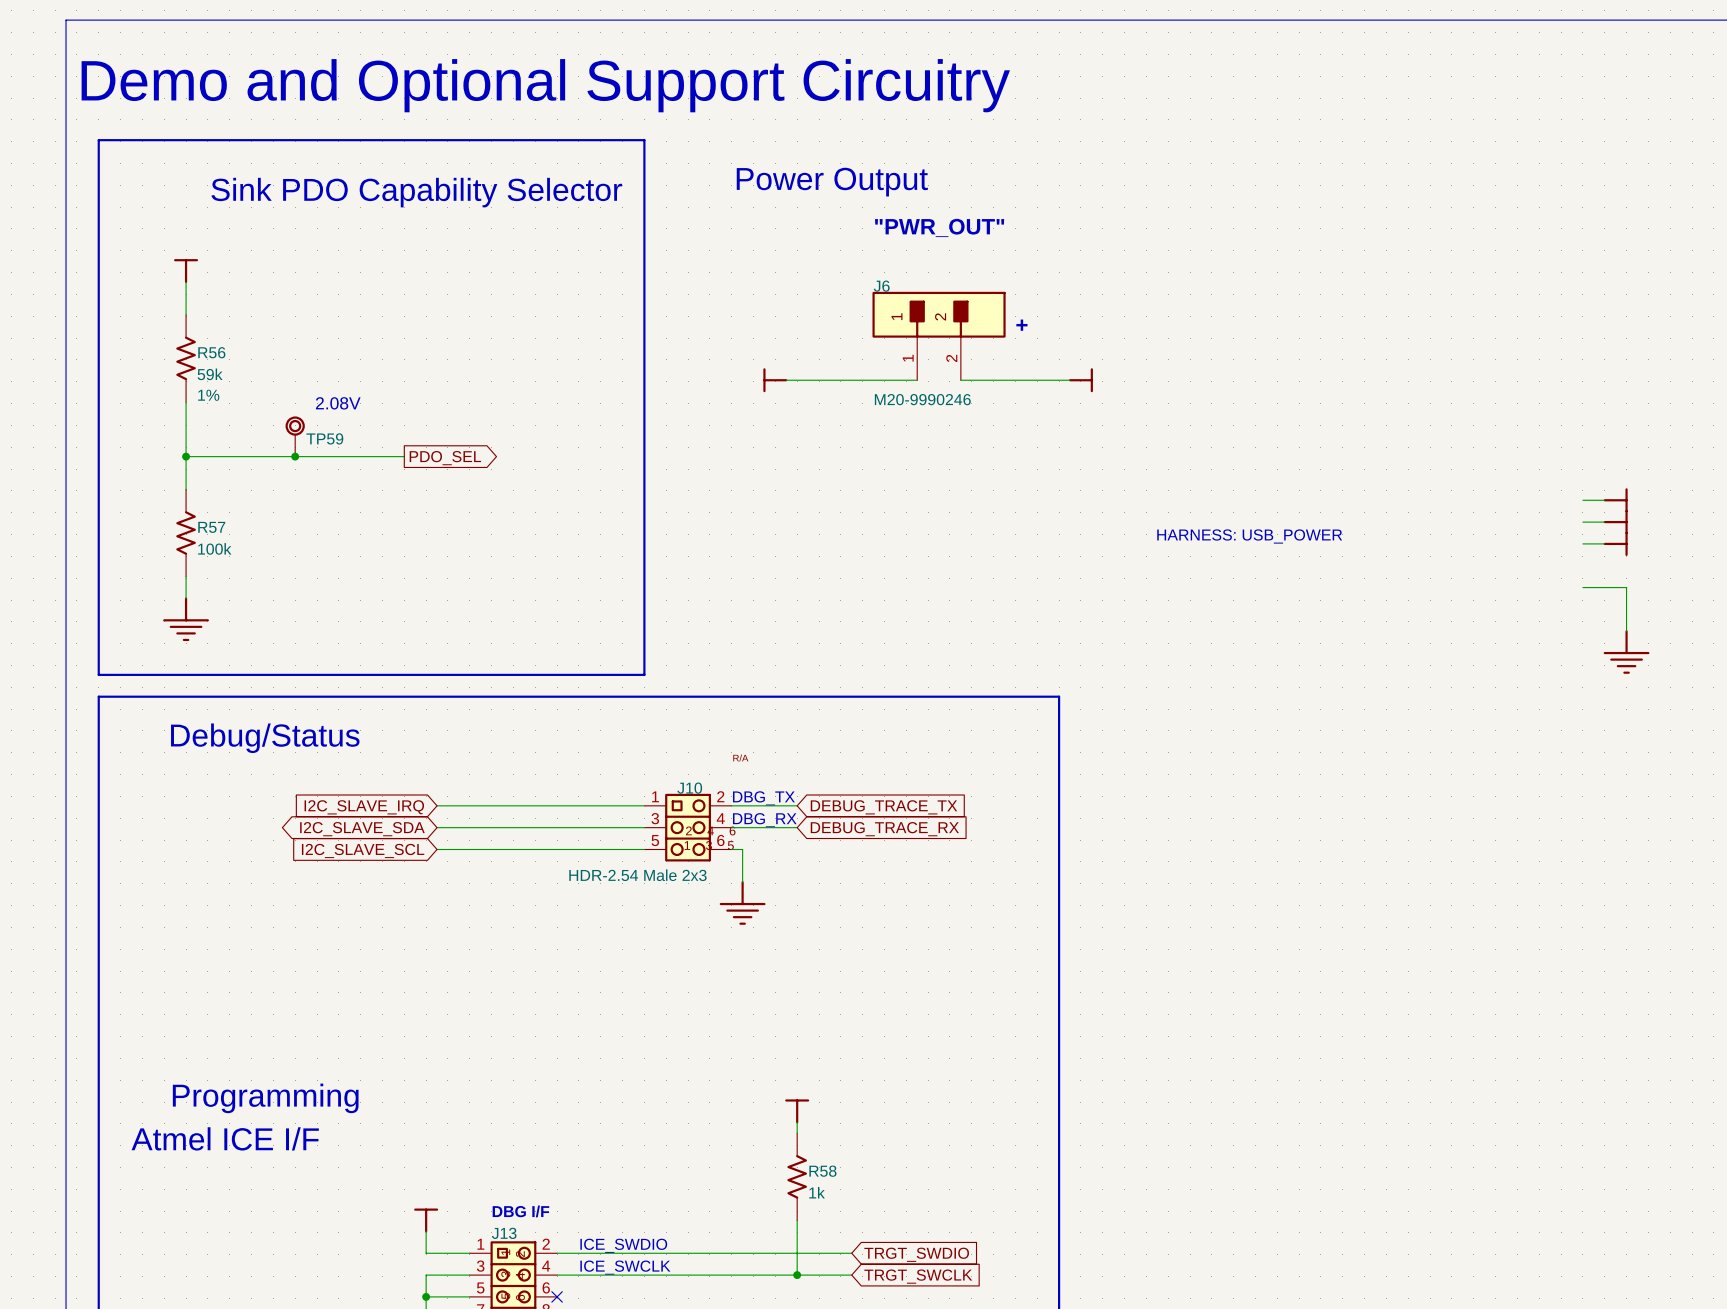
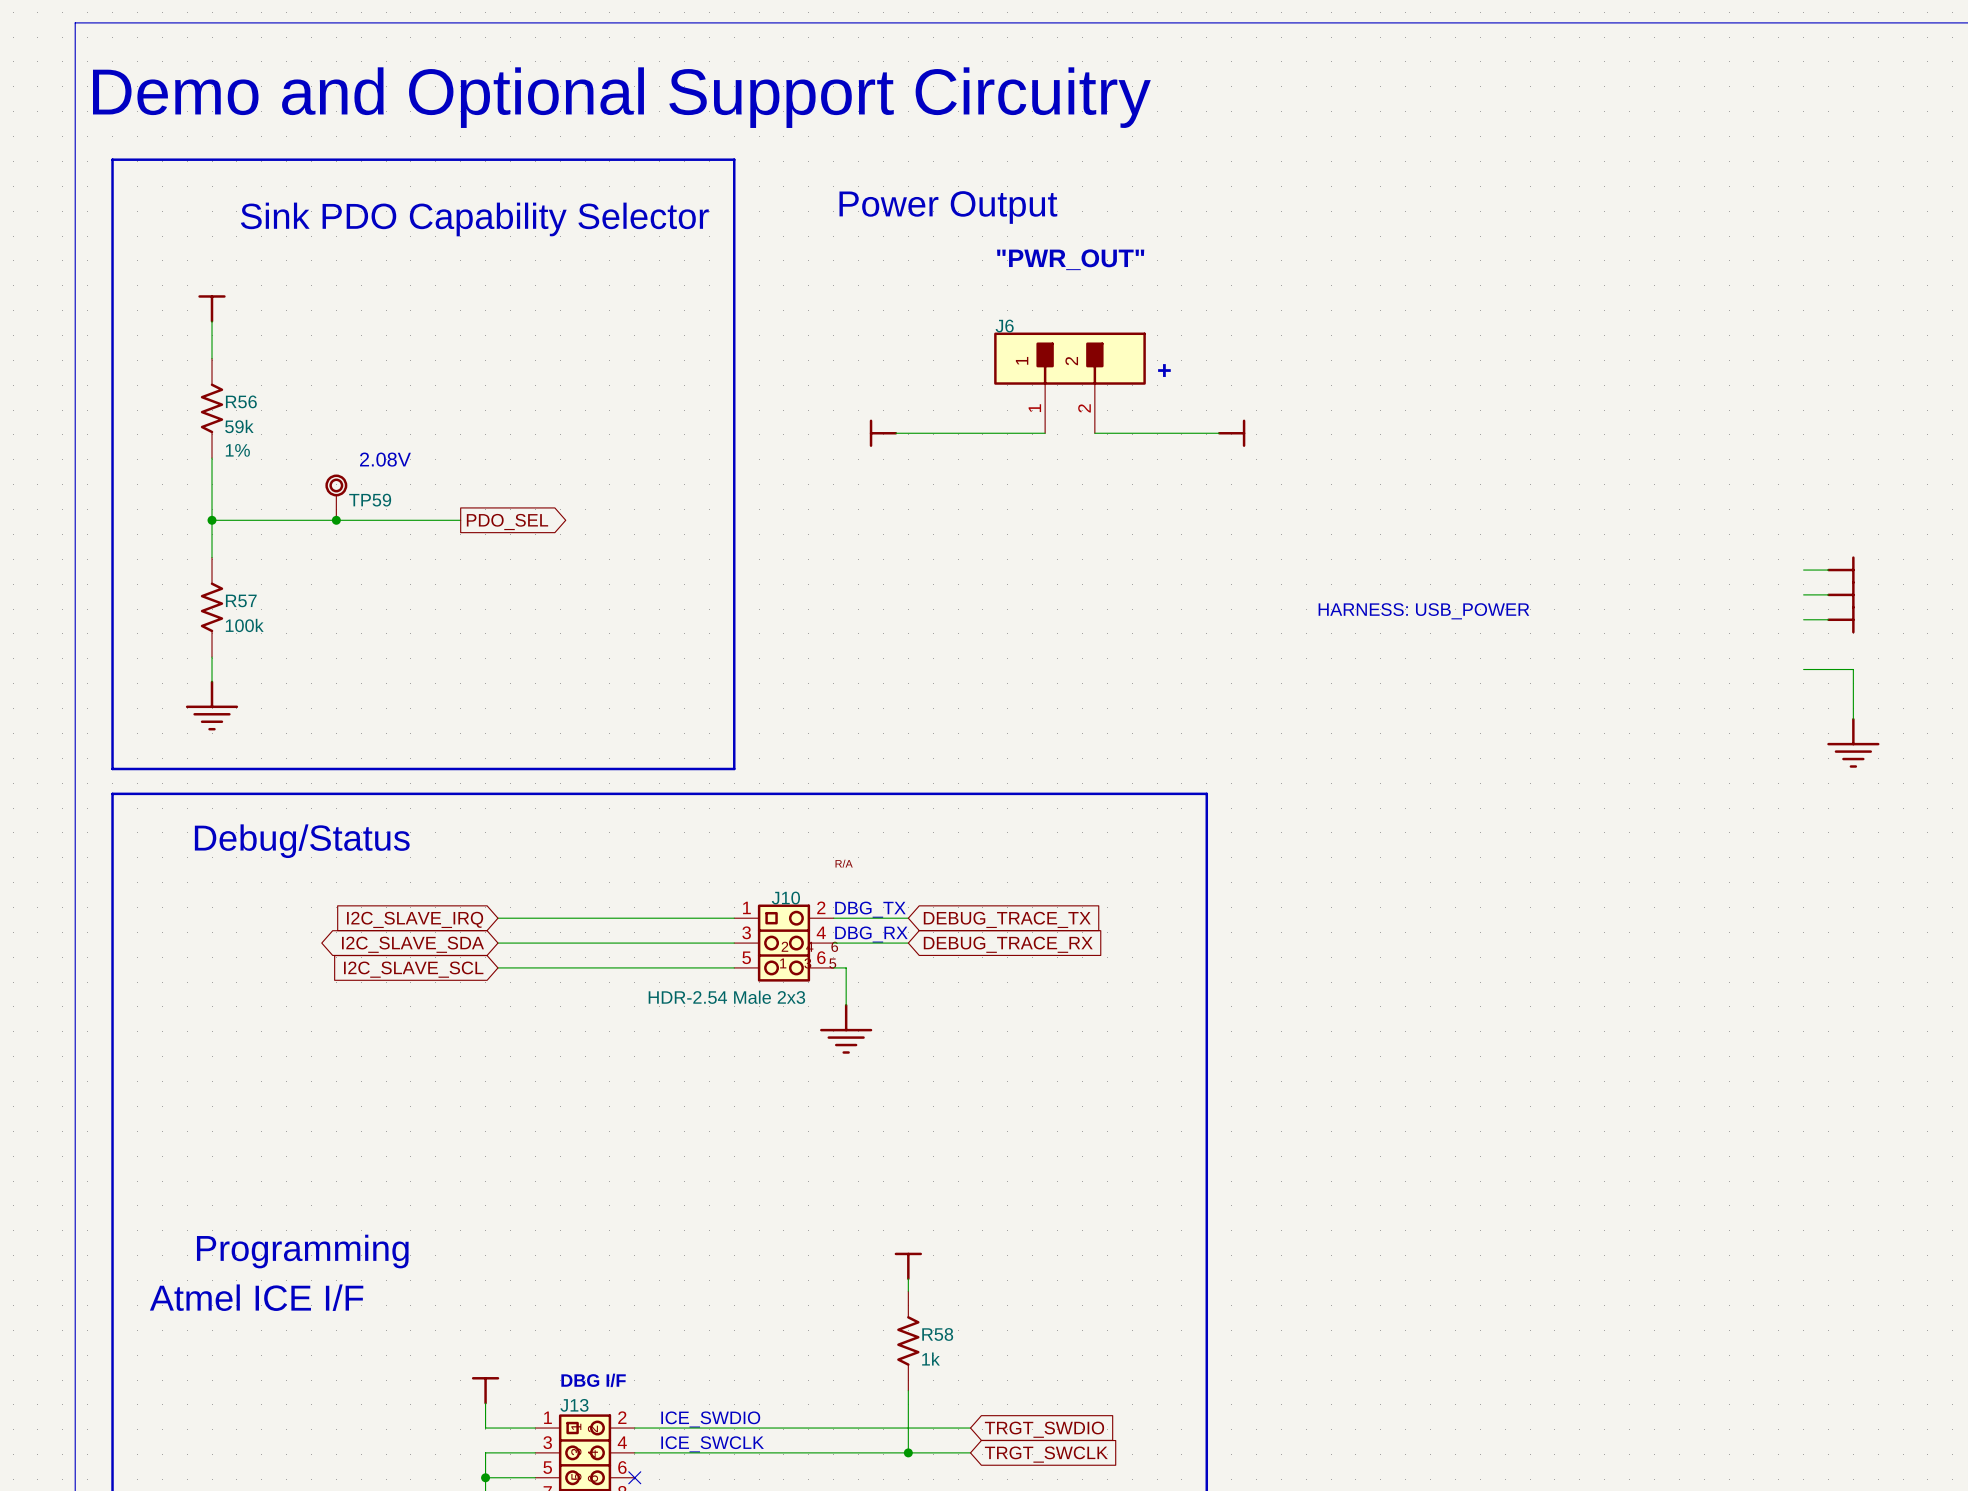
J6 value: M20-9990246 (922, 399) -> none

